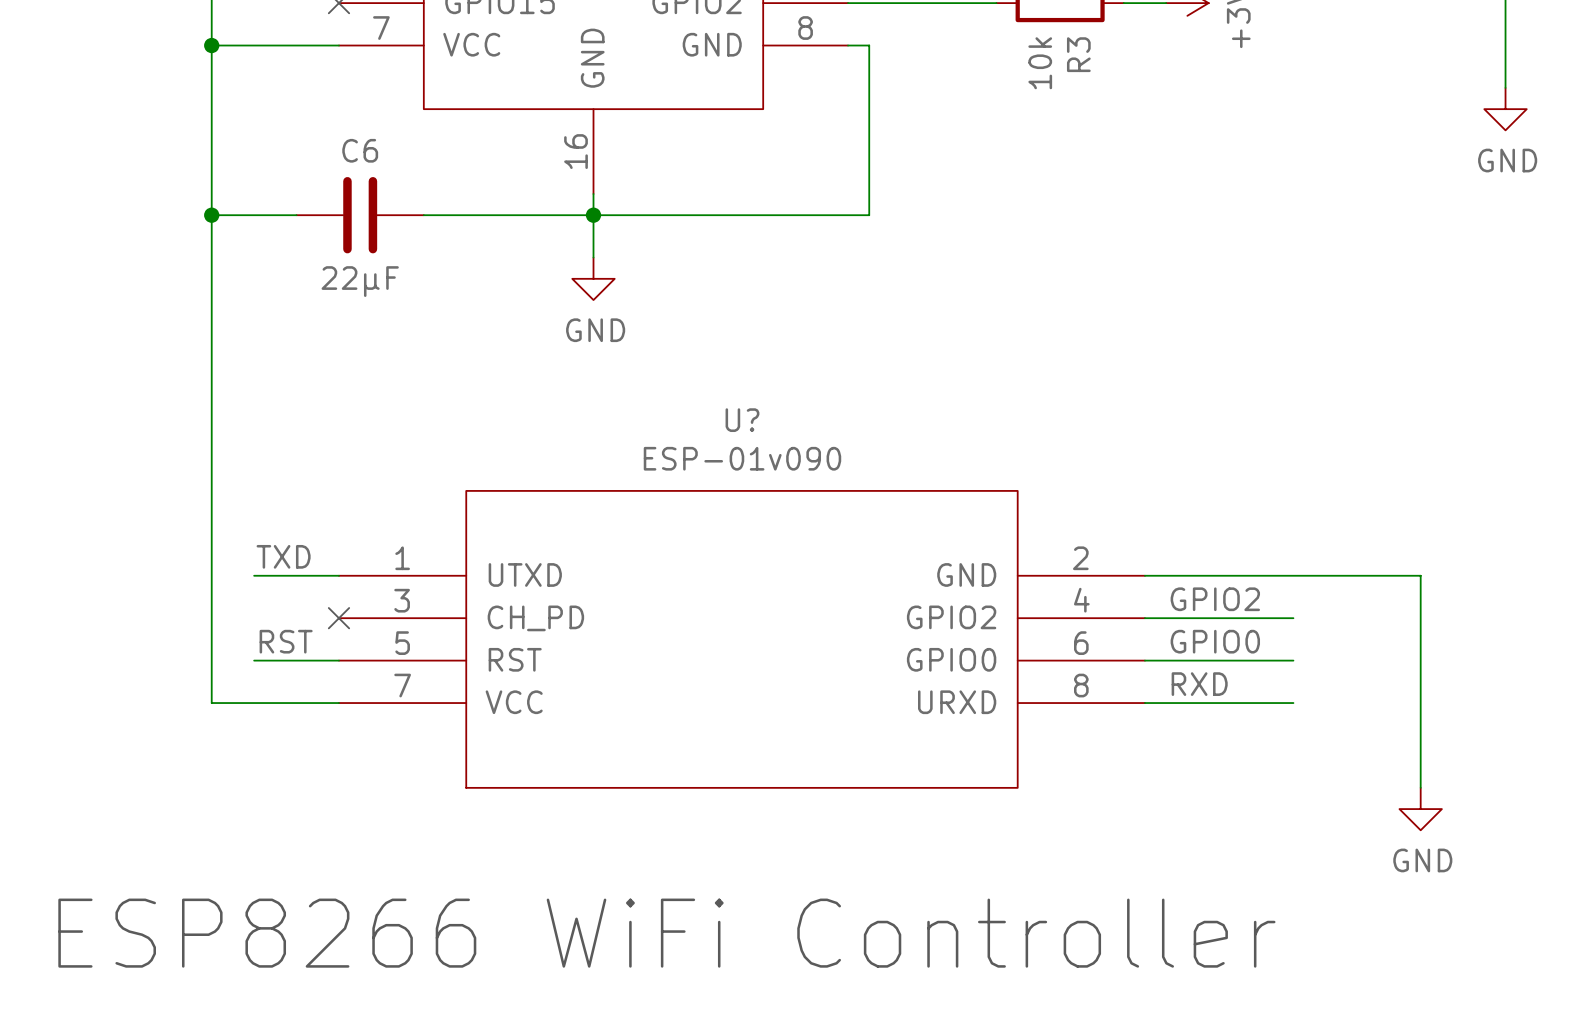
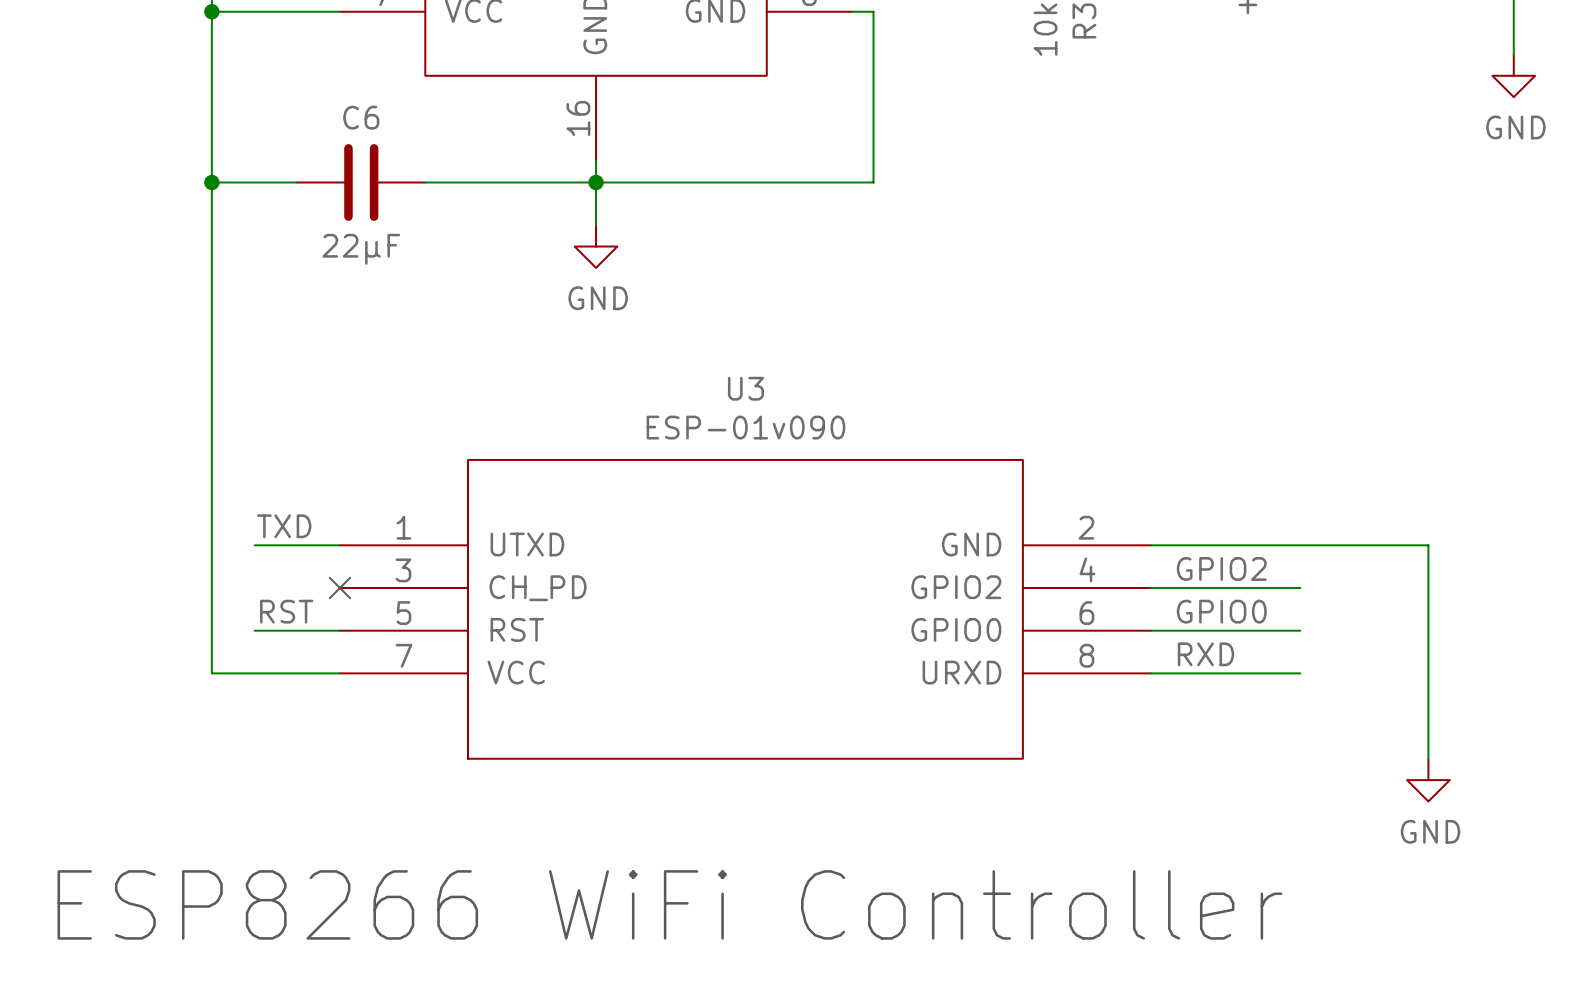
U? name: U? (742, 420) -> U3 (745, 388)

